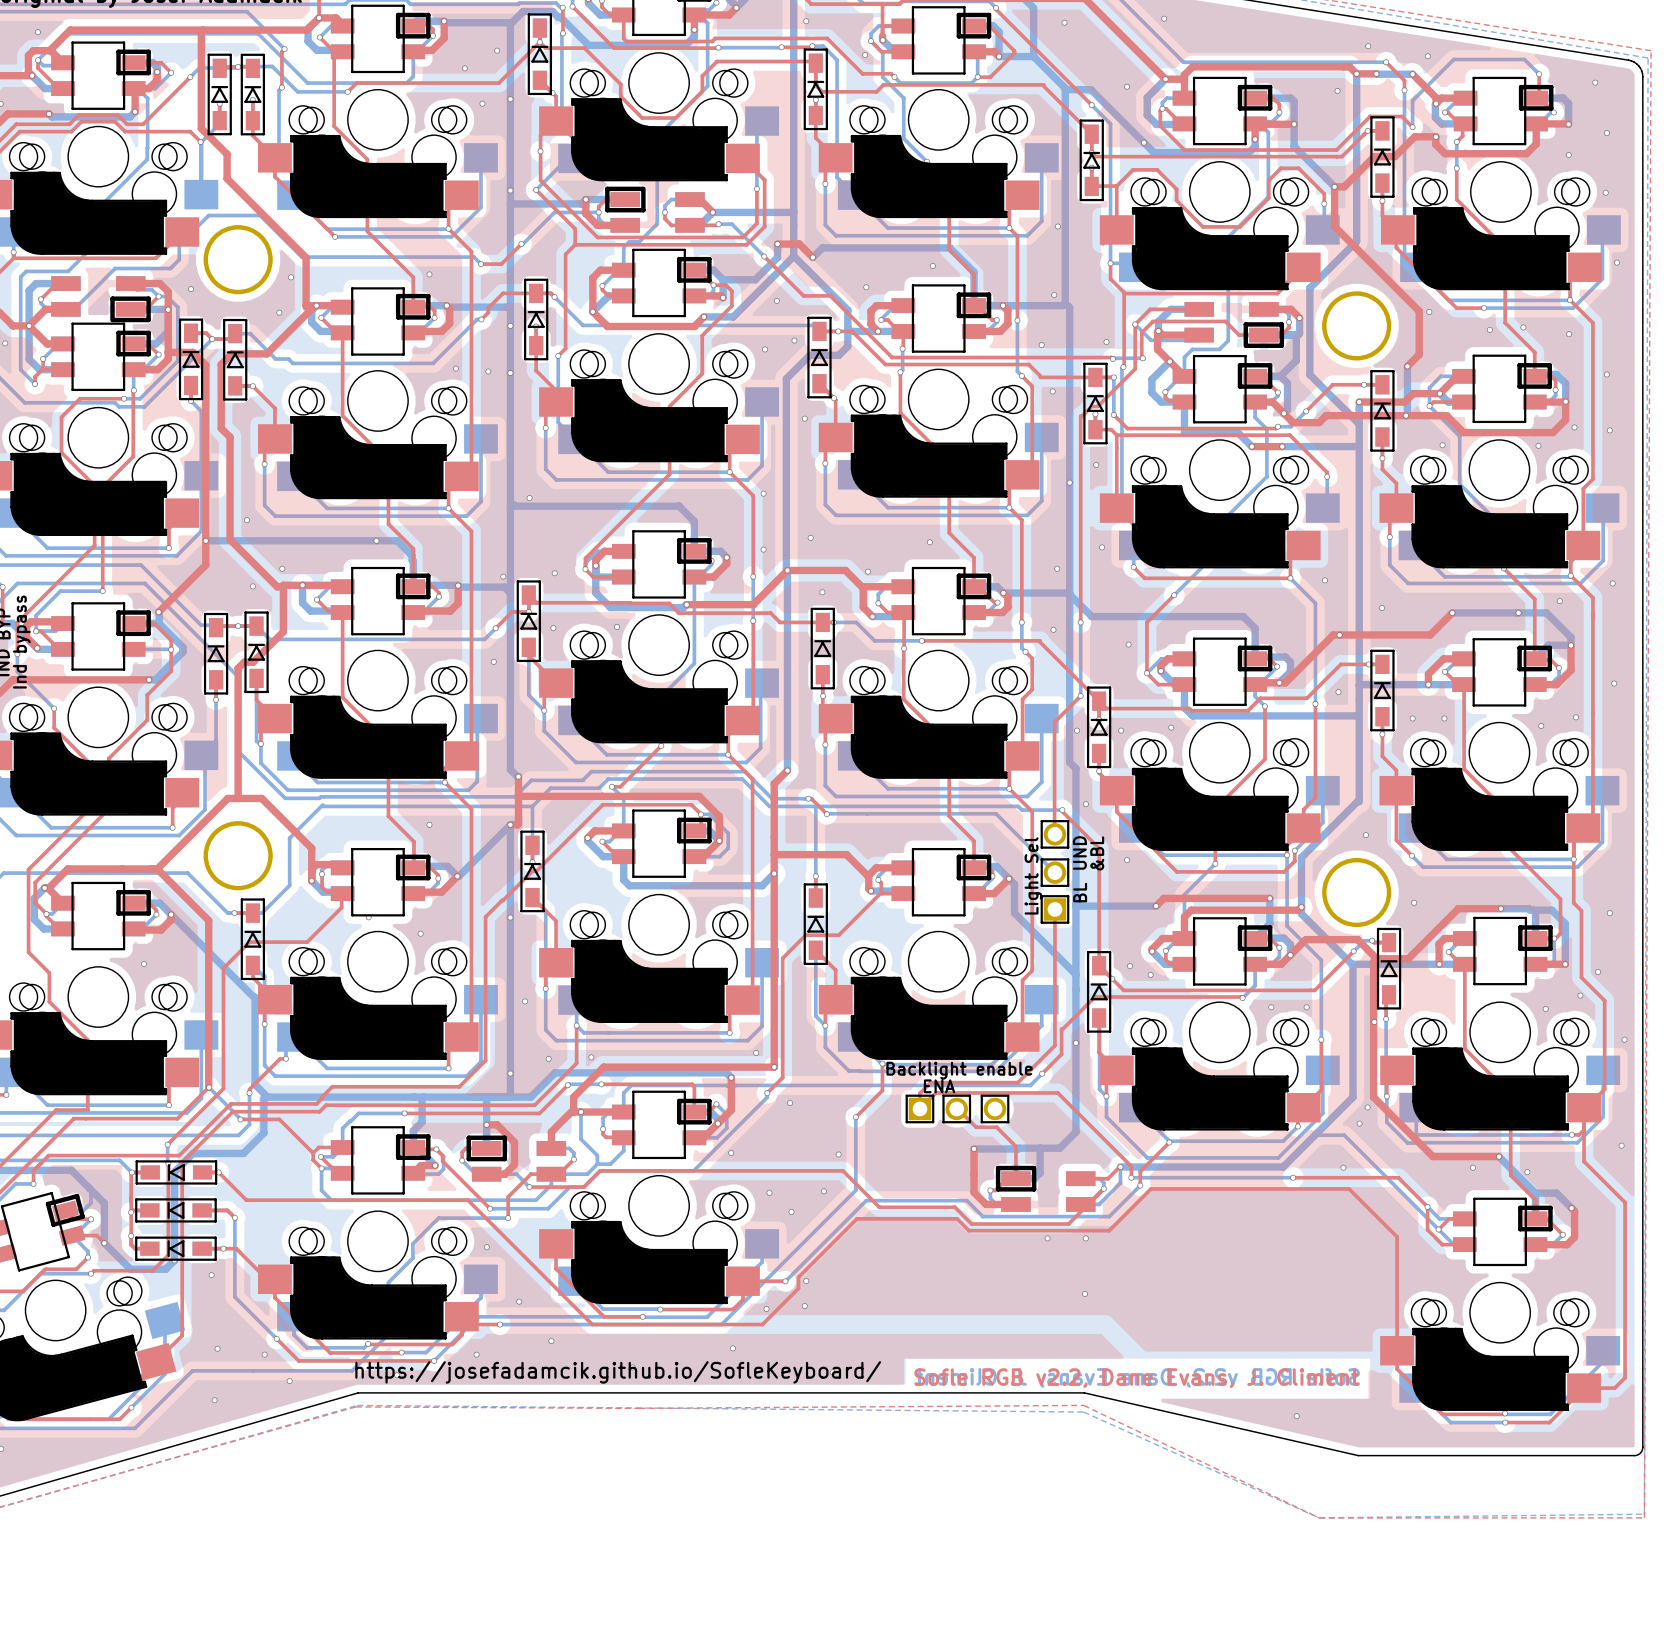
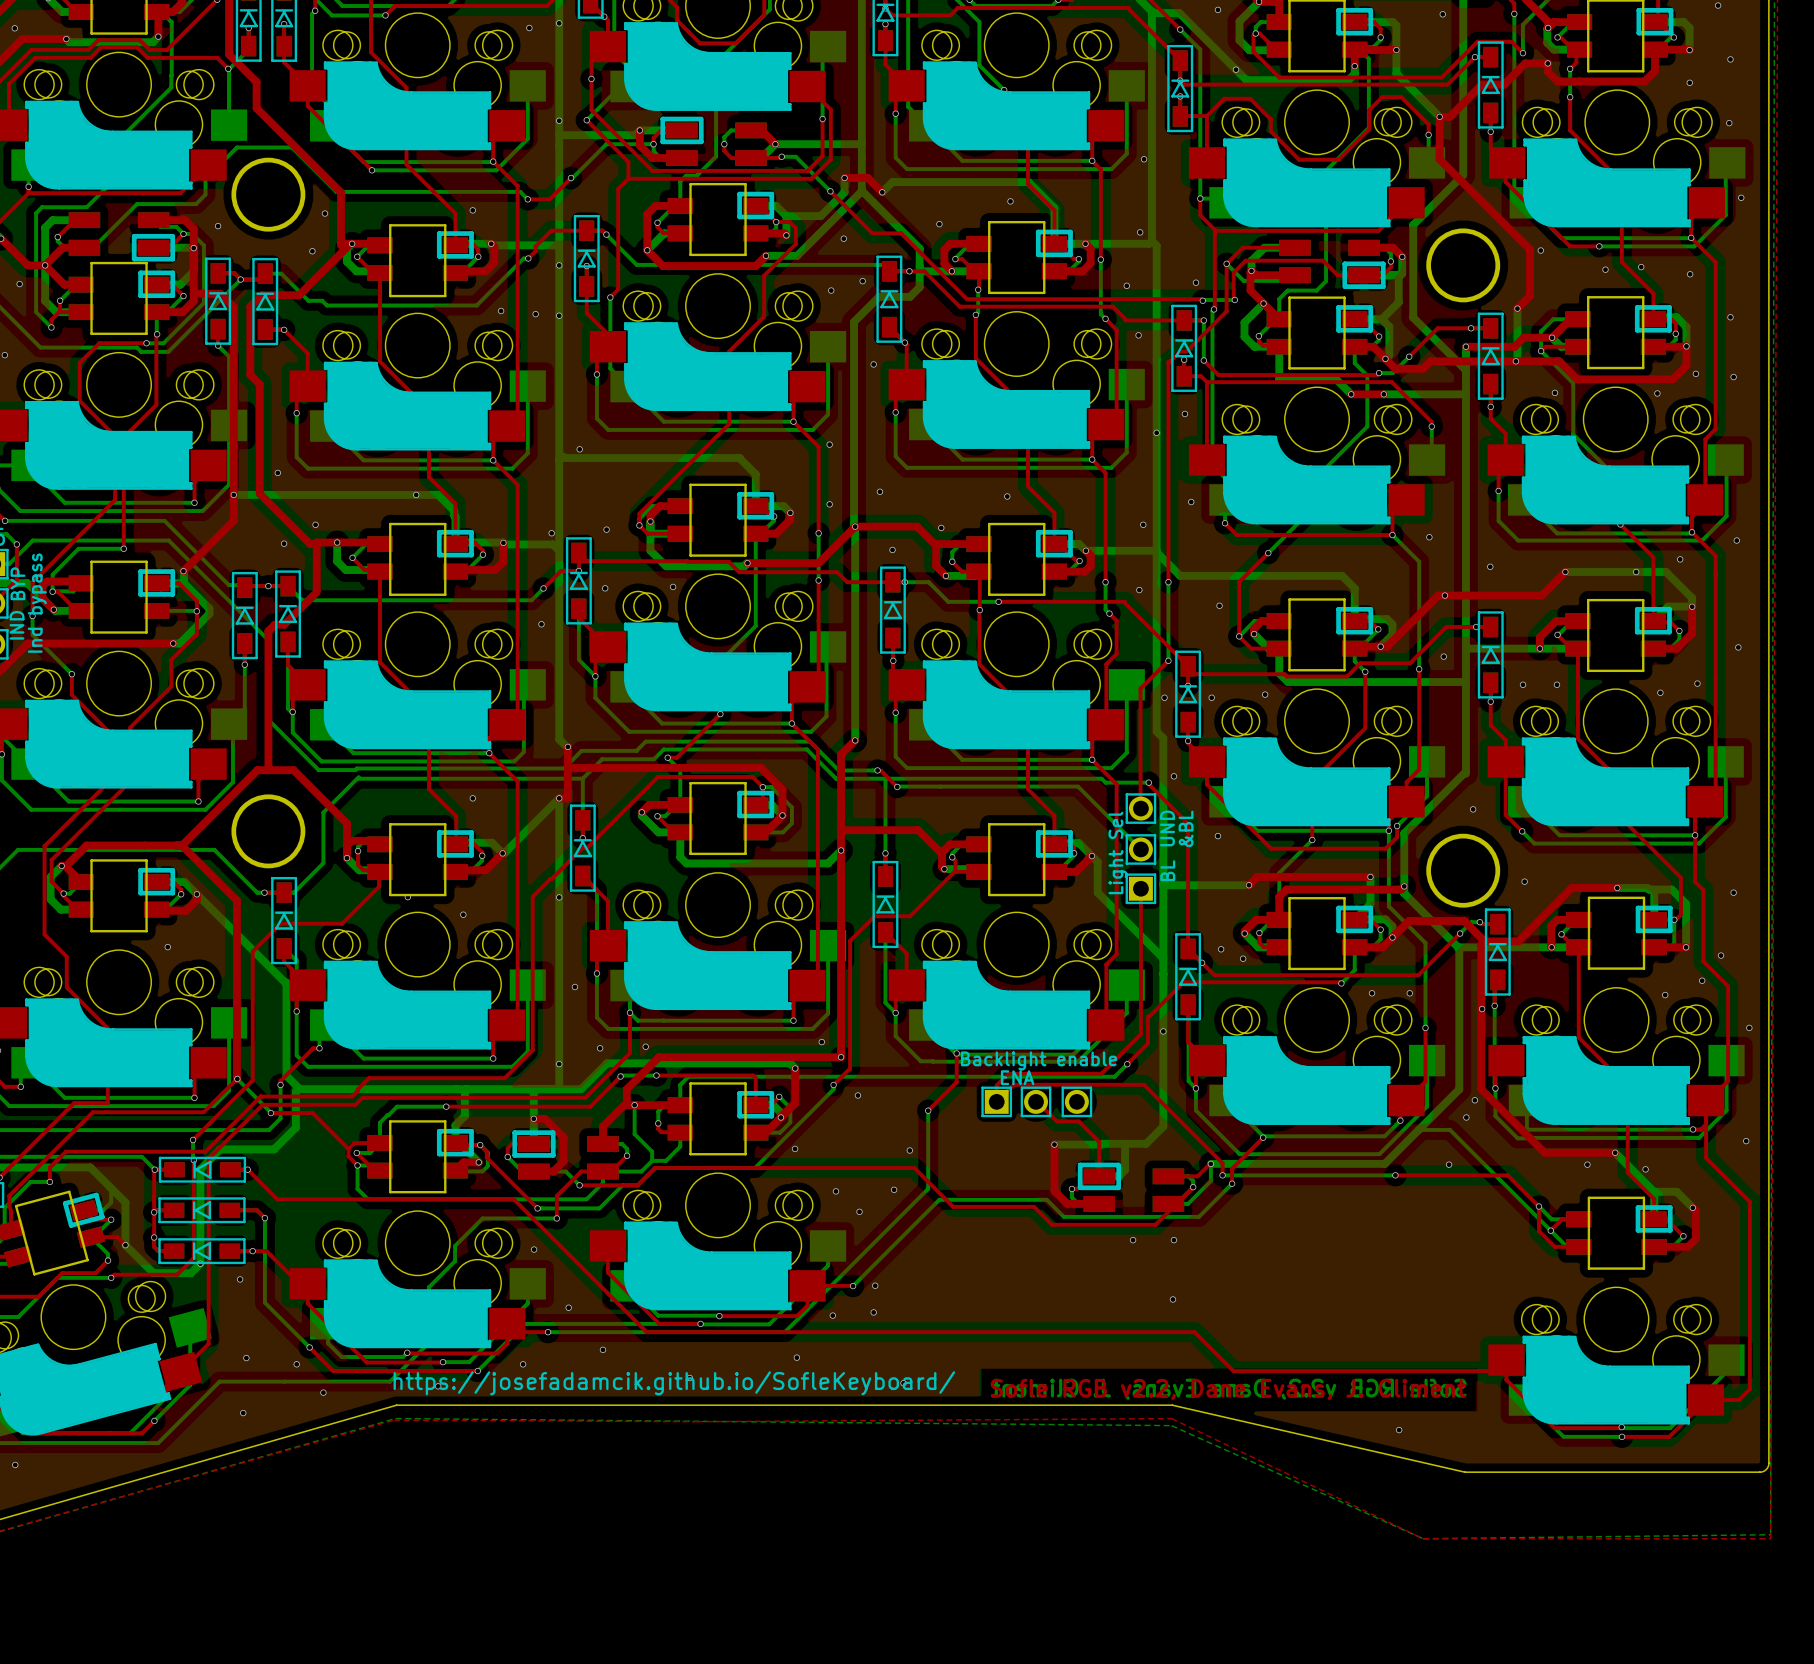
top track: (762, 1324) (798, 1288) (798, 1277) (857, 1218) (957, 1218) (968, 1230) (1109, 1230) (1150, 1188) (1349, 1188) (1397, 1236) (1397, 1350) -> (828, 1332) (1194, 1332) (1233, 1371) (1495, 1371)

